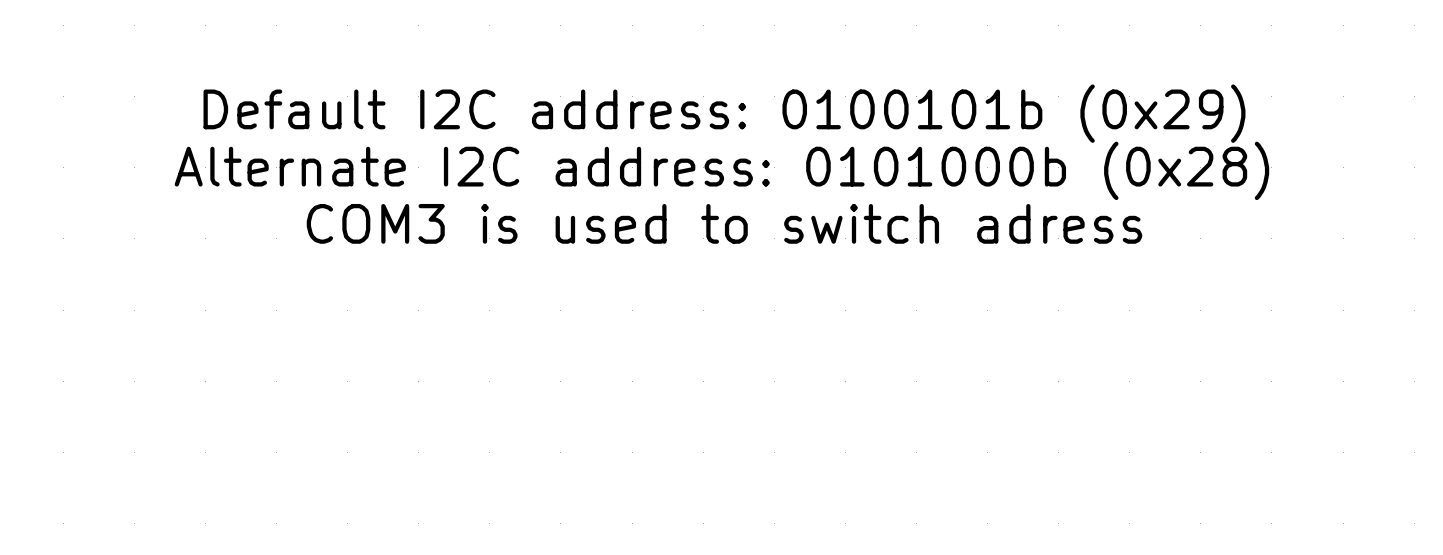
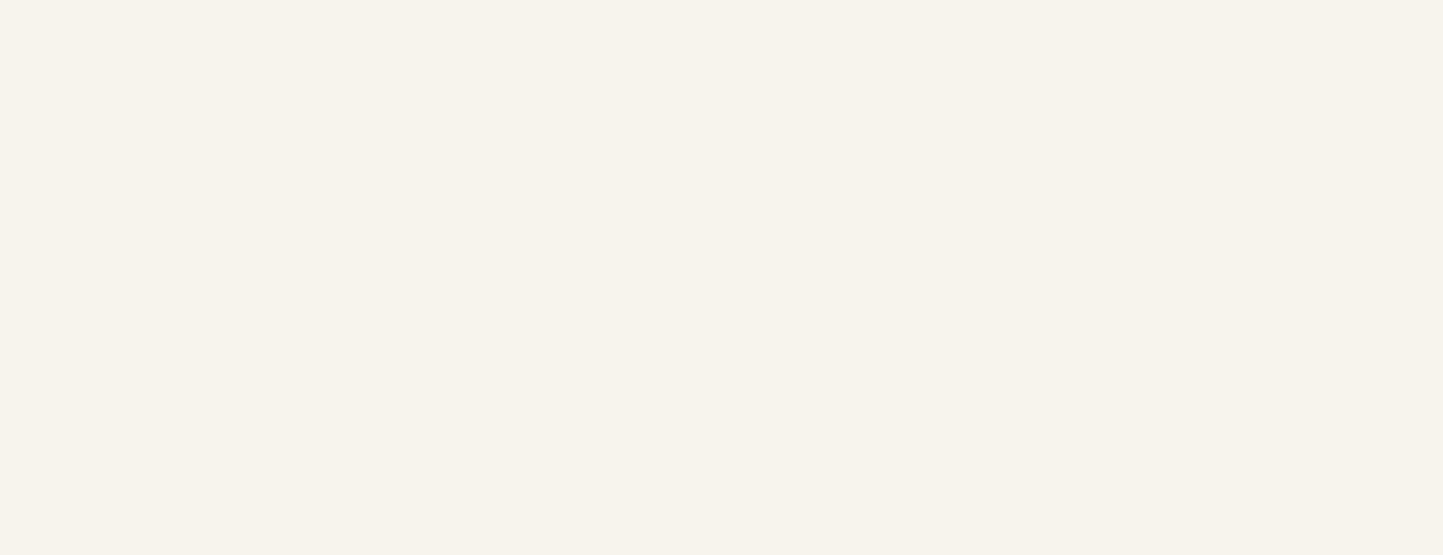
text: Default I2C address: 0100101b (0x29) (724, 113) -> none
text: Alternate I2C address: 0101000b (0x28) (721, 170) -> none
text: COM3 is used to switch adress (724, 223) -> none

